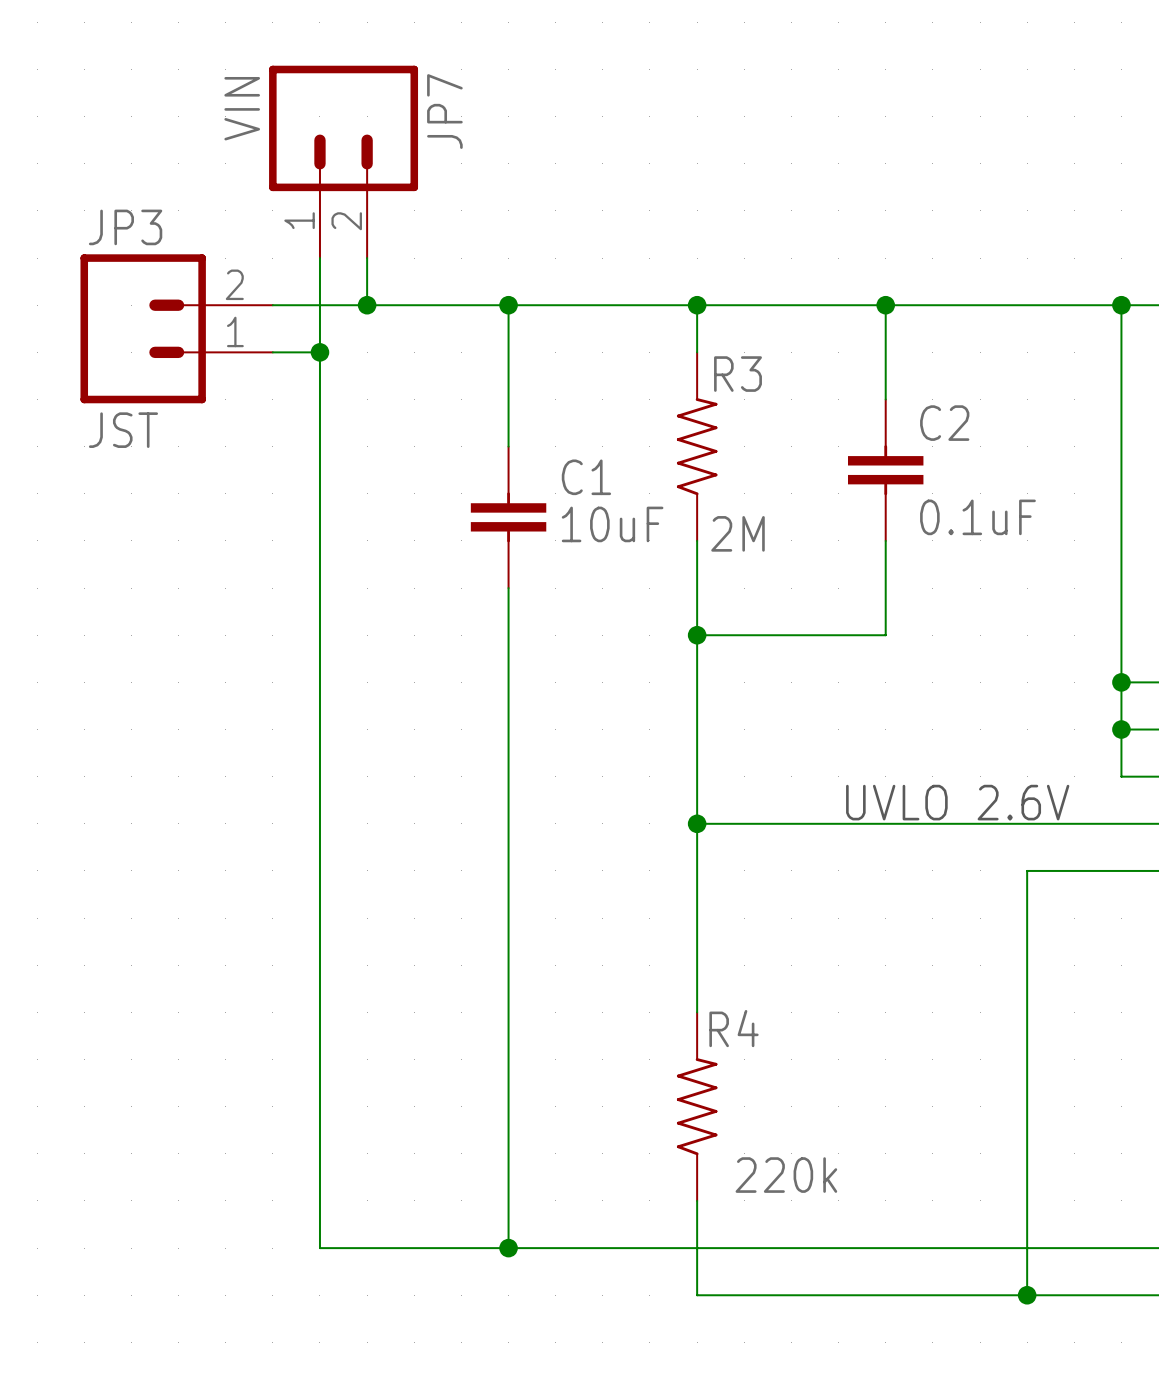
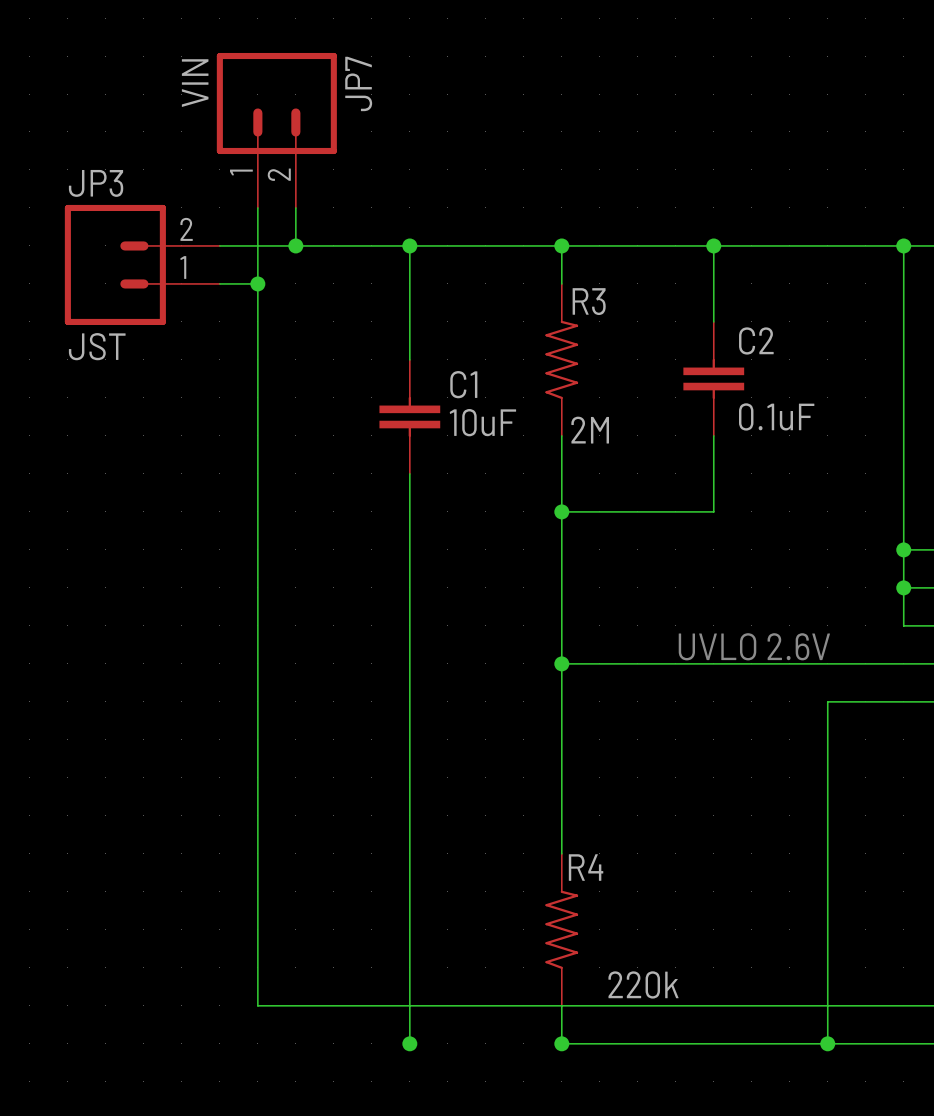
R4 position: (697, 1106) -> (561, 929)
wire: none -> (409, 1005) (409, 1043)
junction position: (508, 1248) -> (409, 1043)
junction: none -> (561, 1043)

